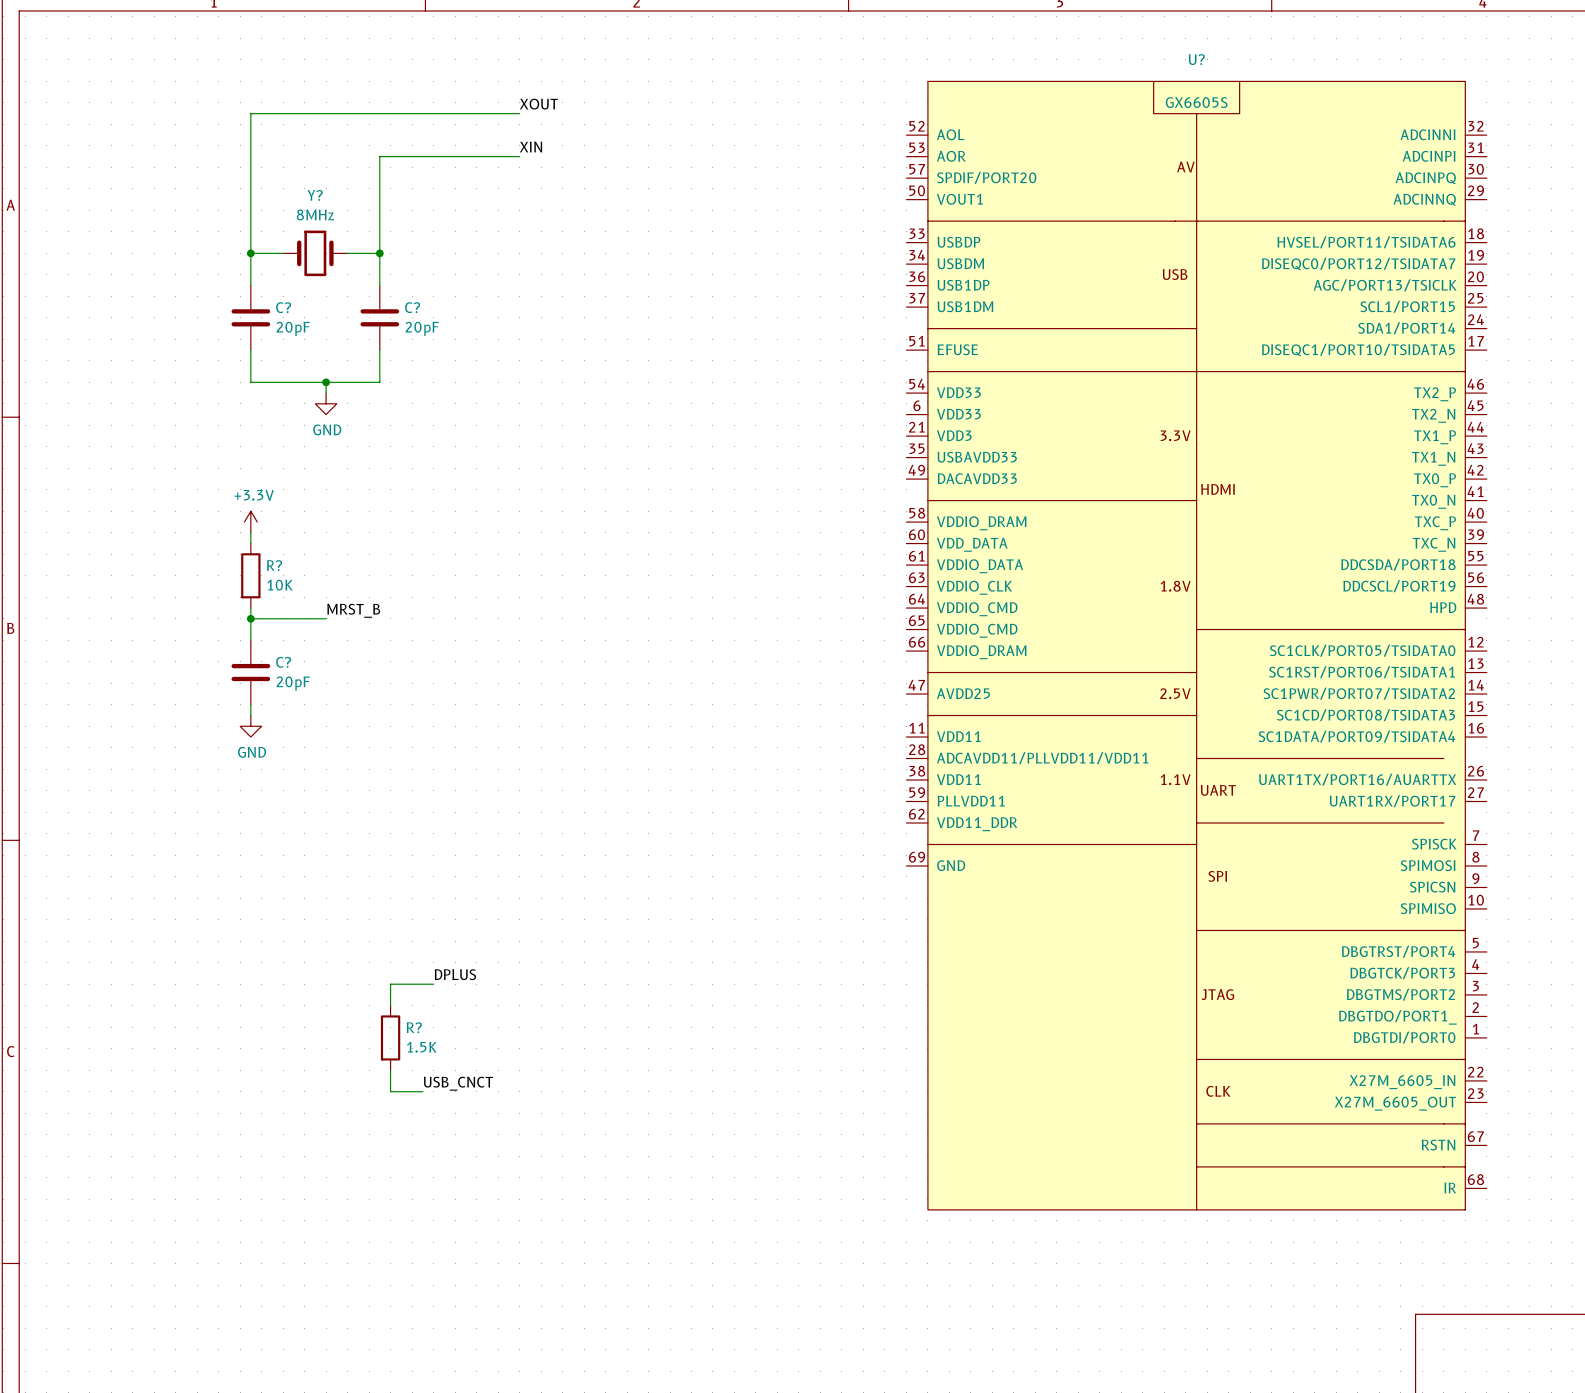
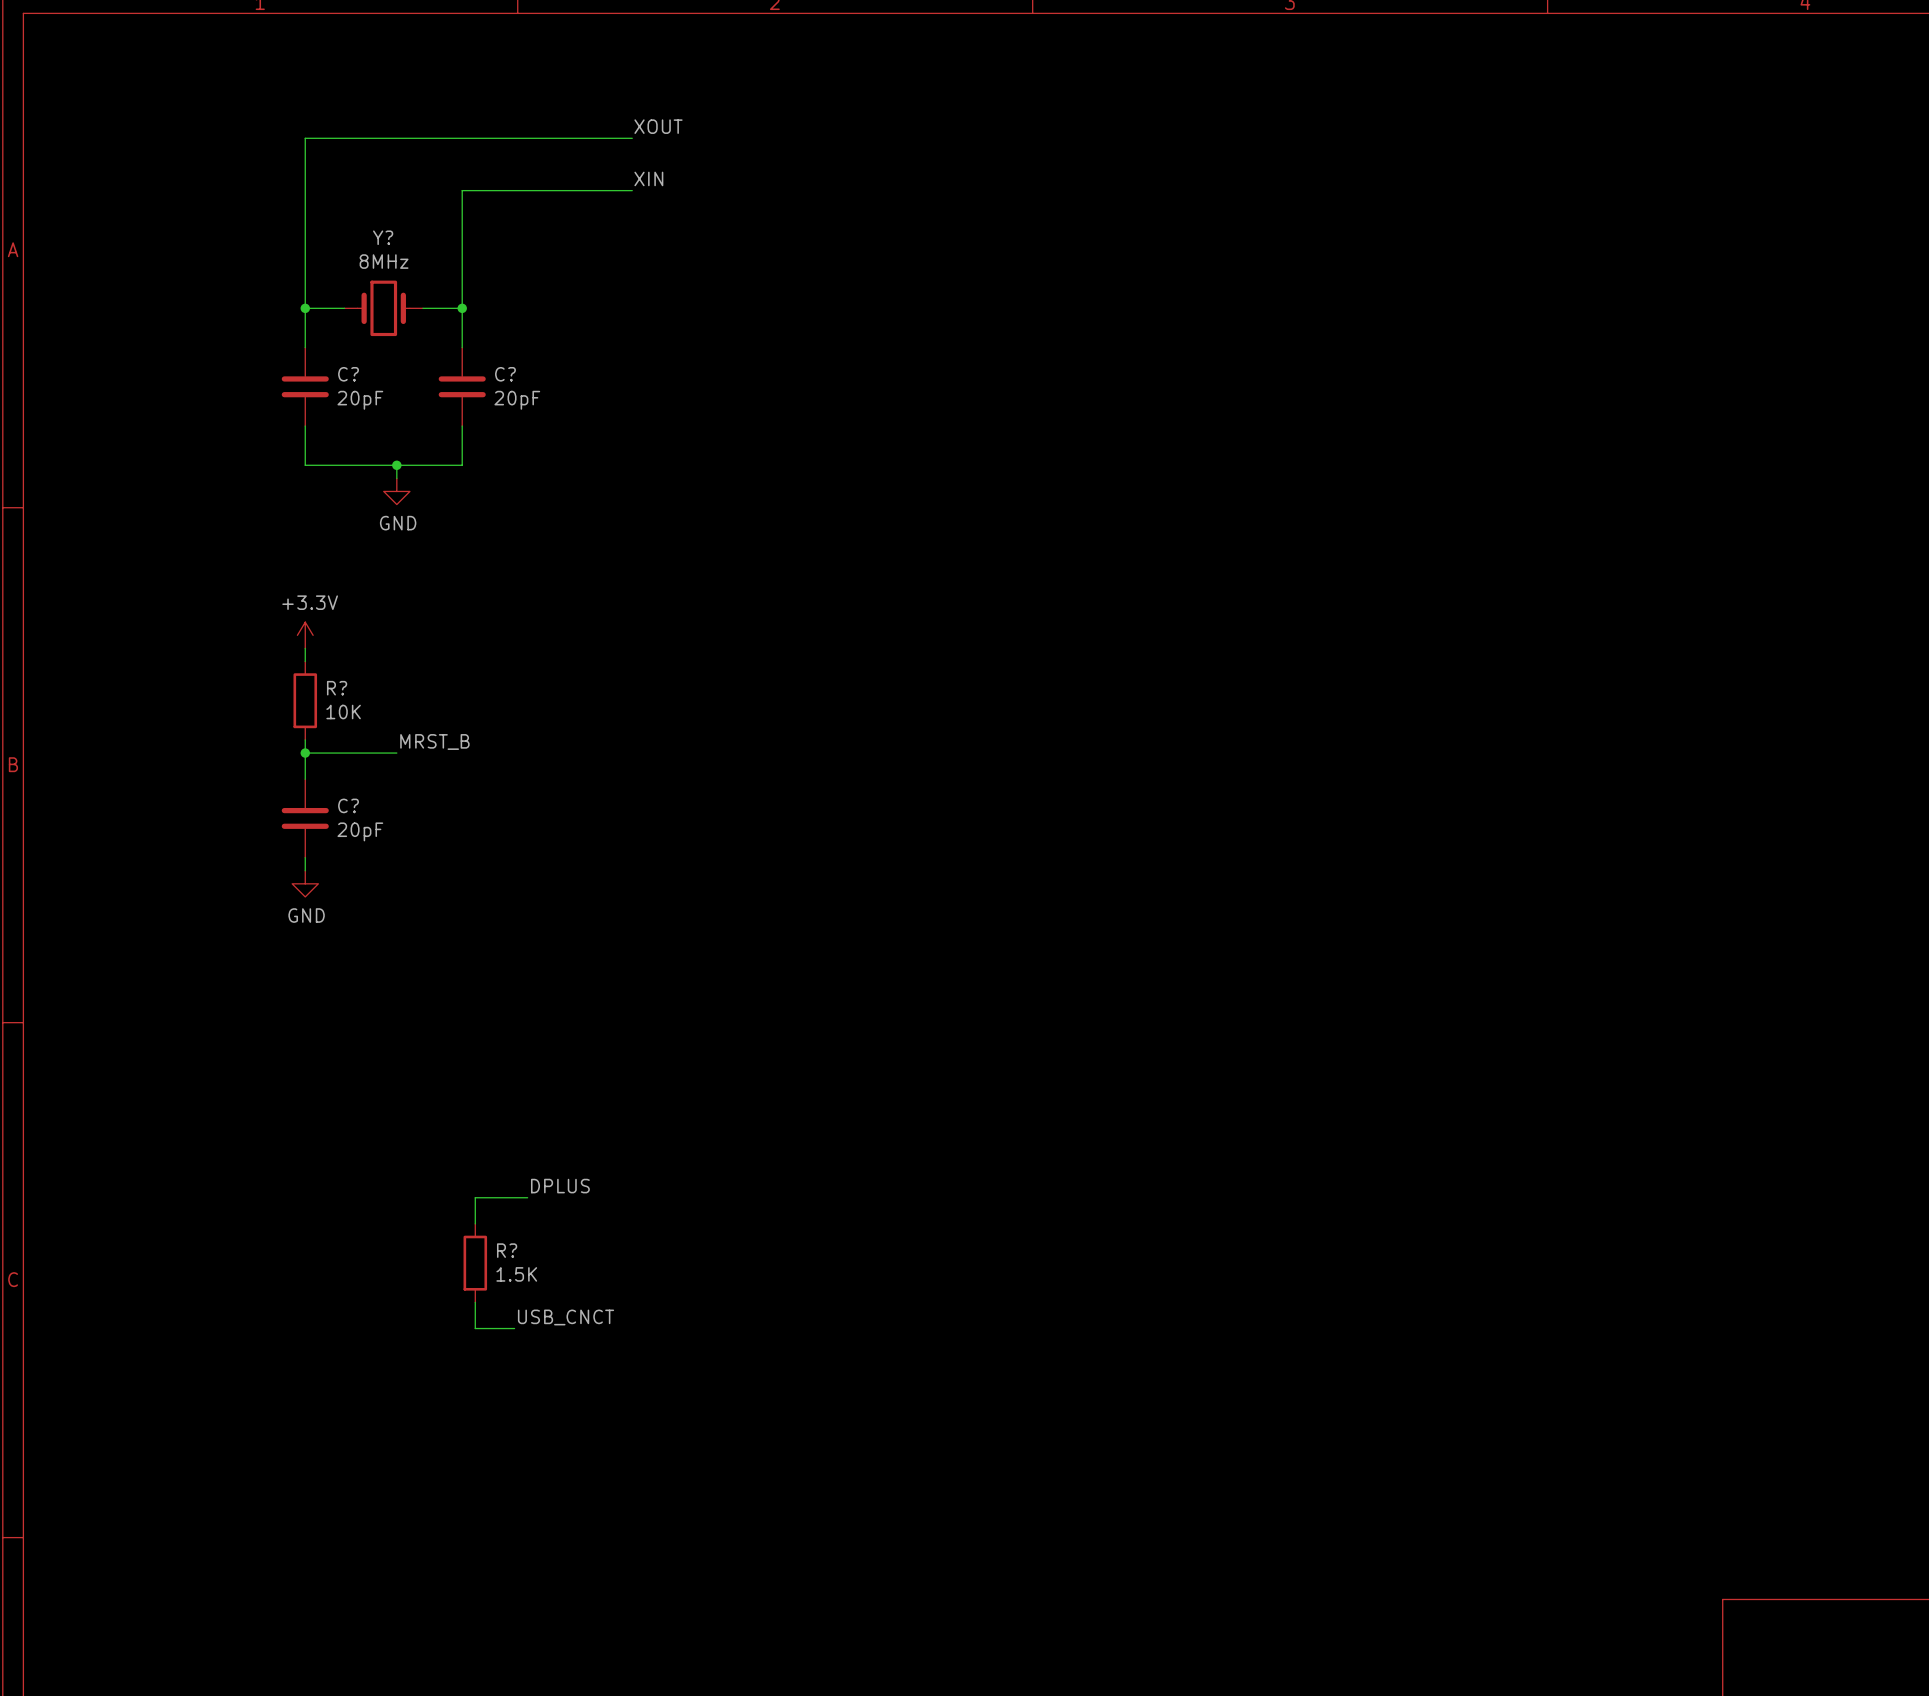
U?: GX6605S (1196, 645) -> none

